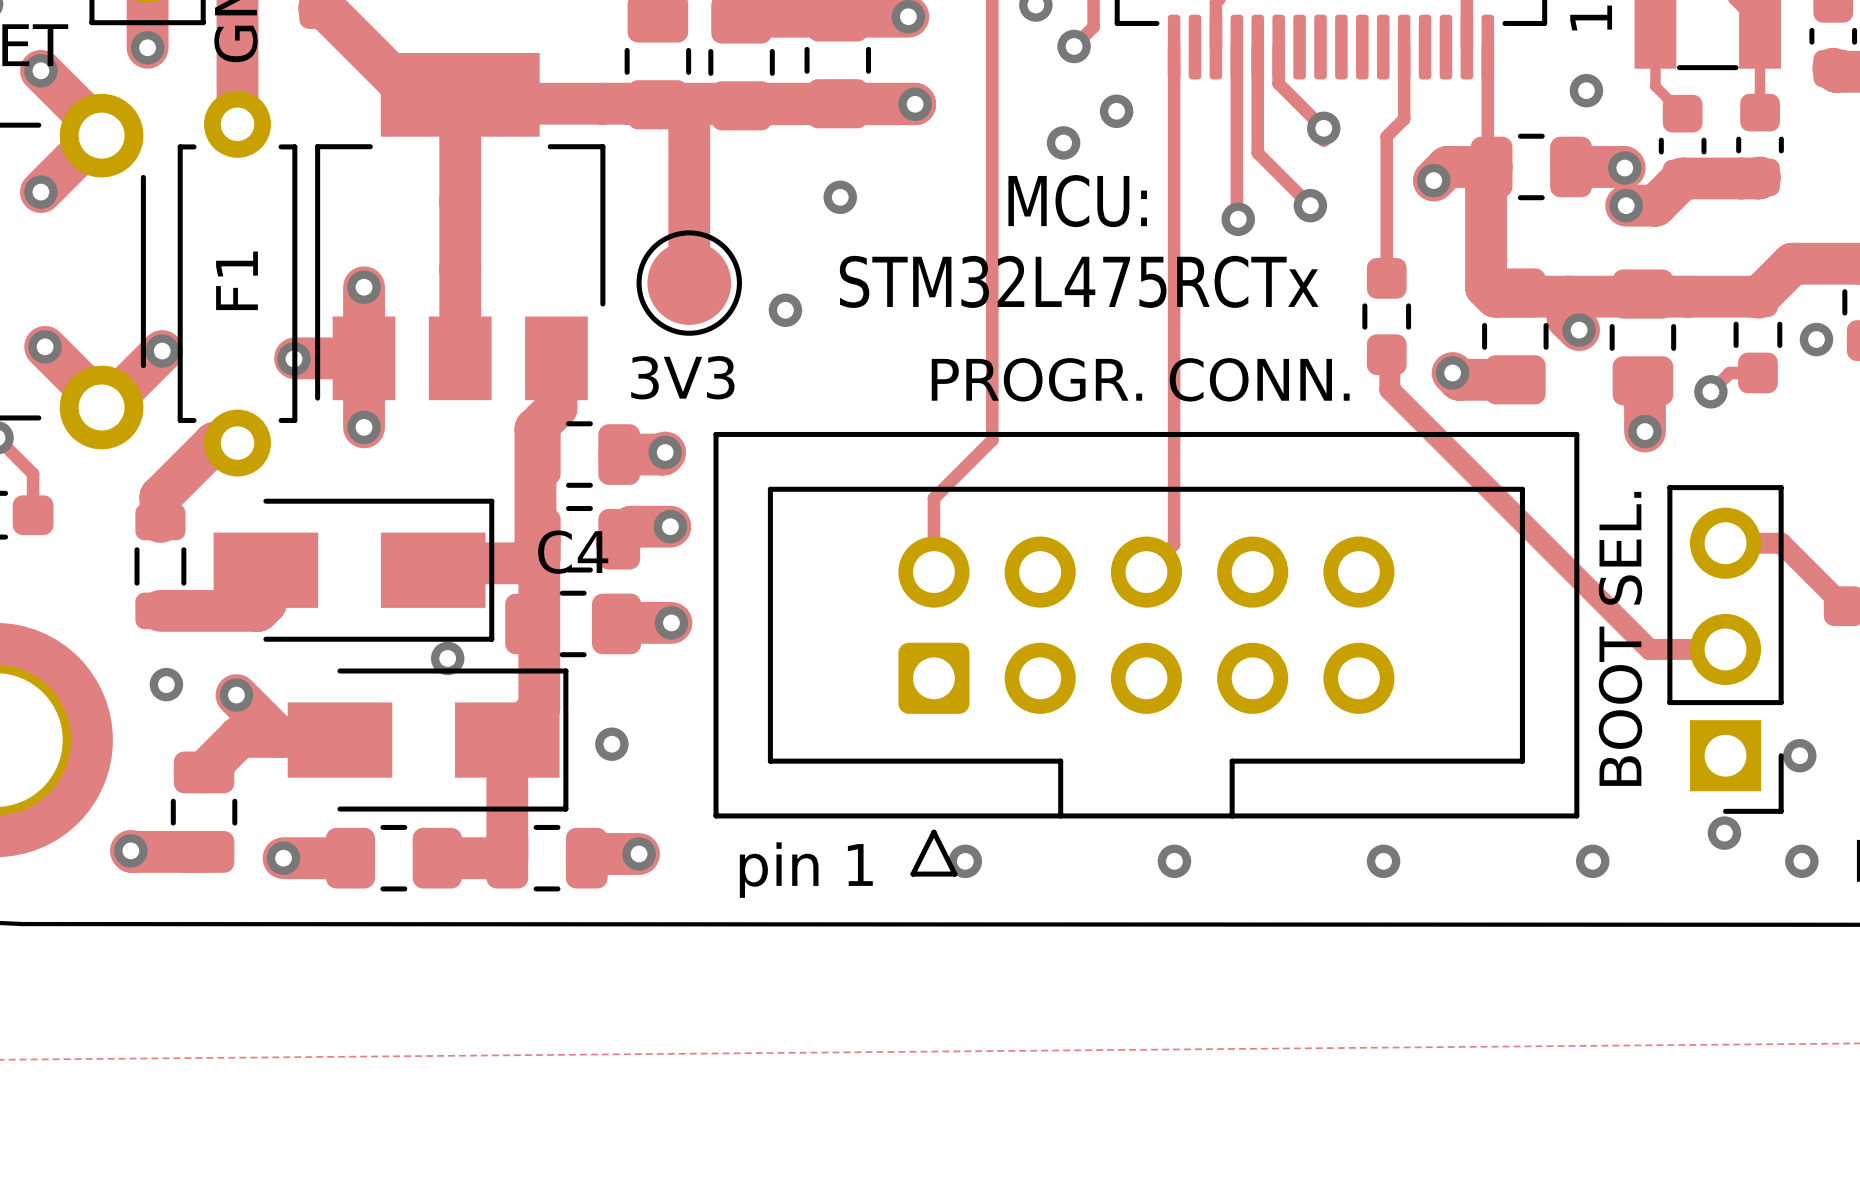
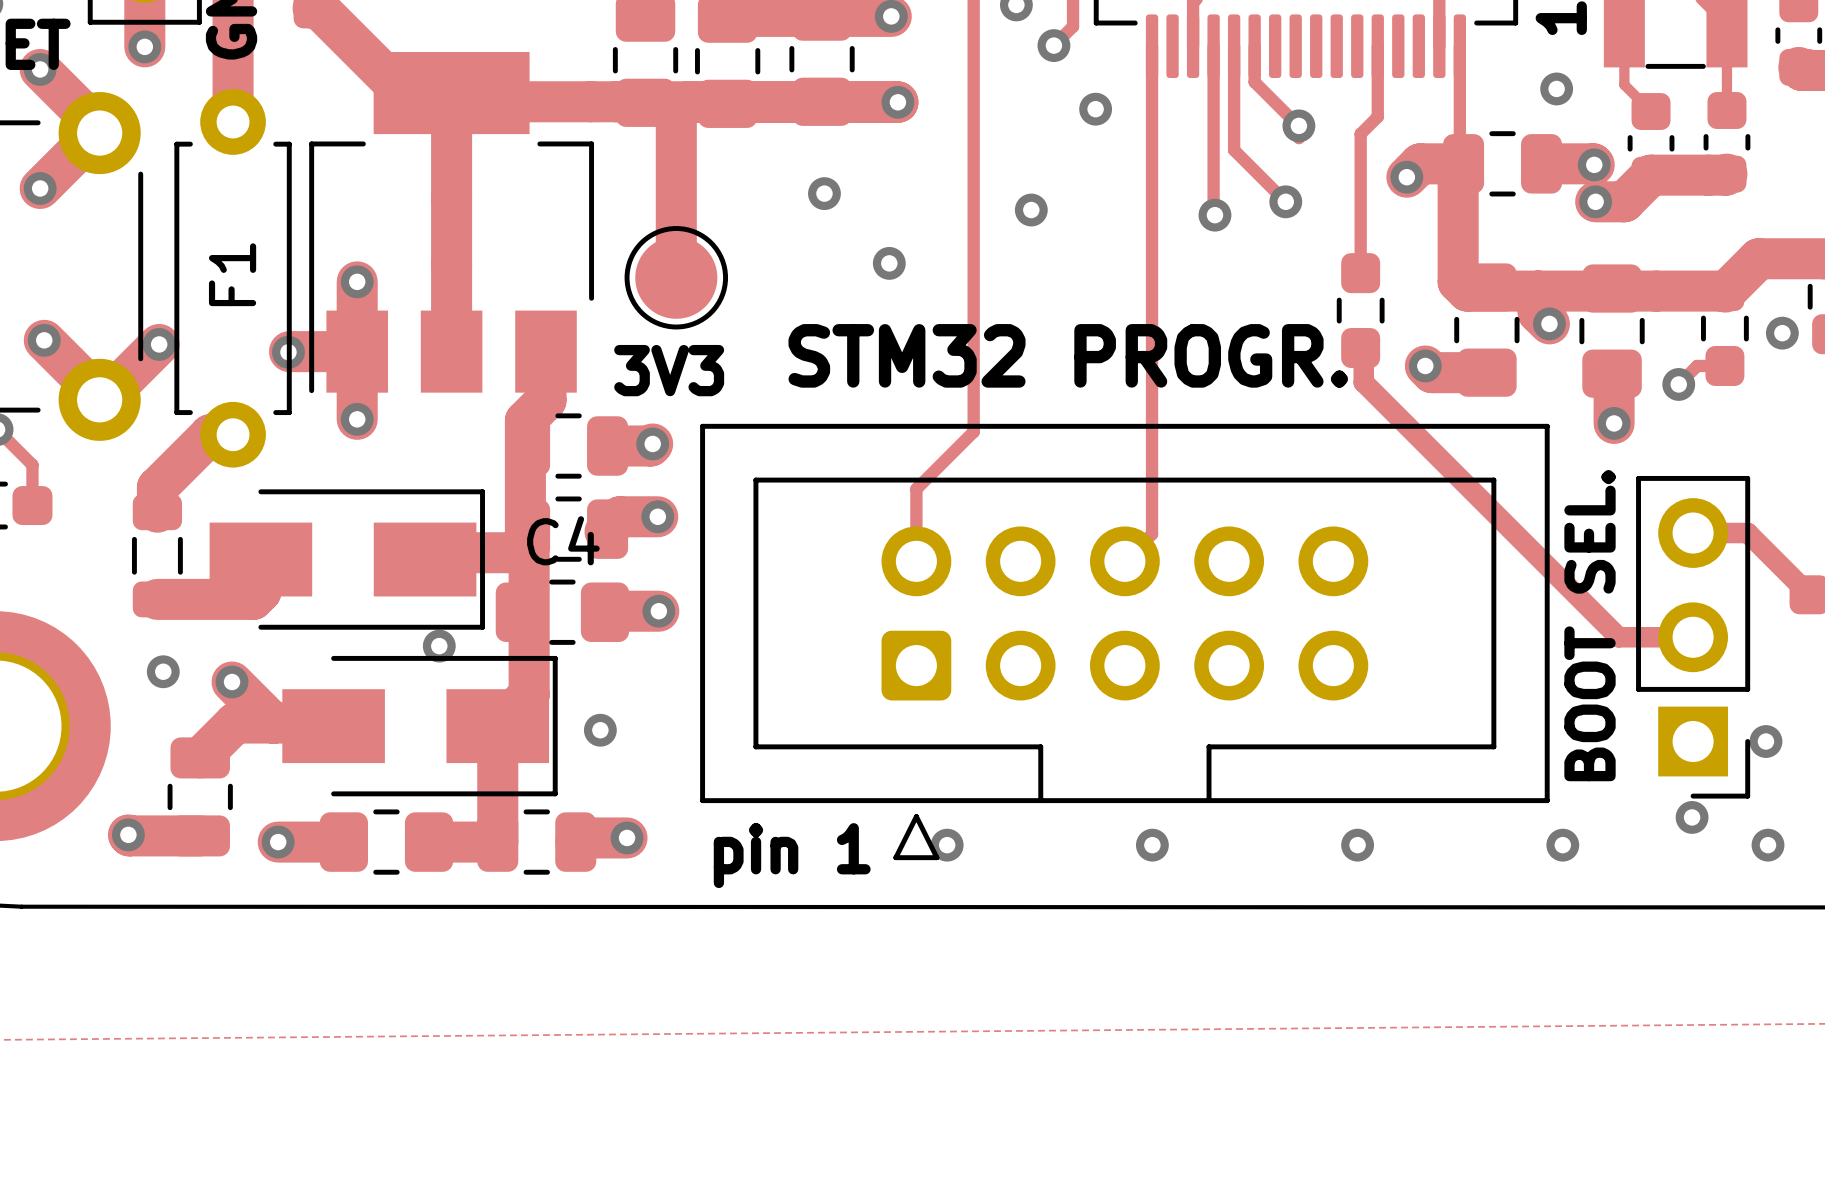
via position: (1063, 142) -> (1031, 210)
text: MCU: (1077, 201) -> none
via: none -> (889, 263)
text: STM32L475RCTx (1079, 281) -> none
via: (785, 310) -> none
text: none -> STM32 PROGR. (1068, 355)
text: PROGR. CONN. (1140, 379) -> none

